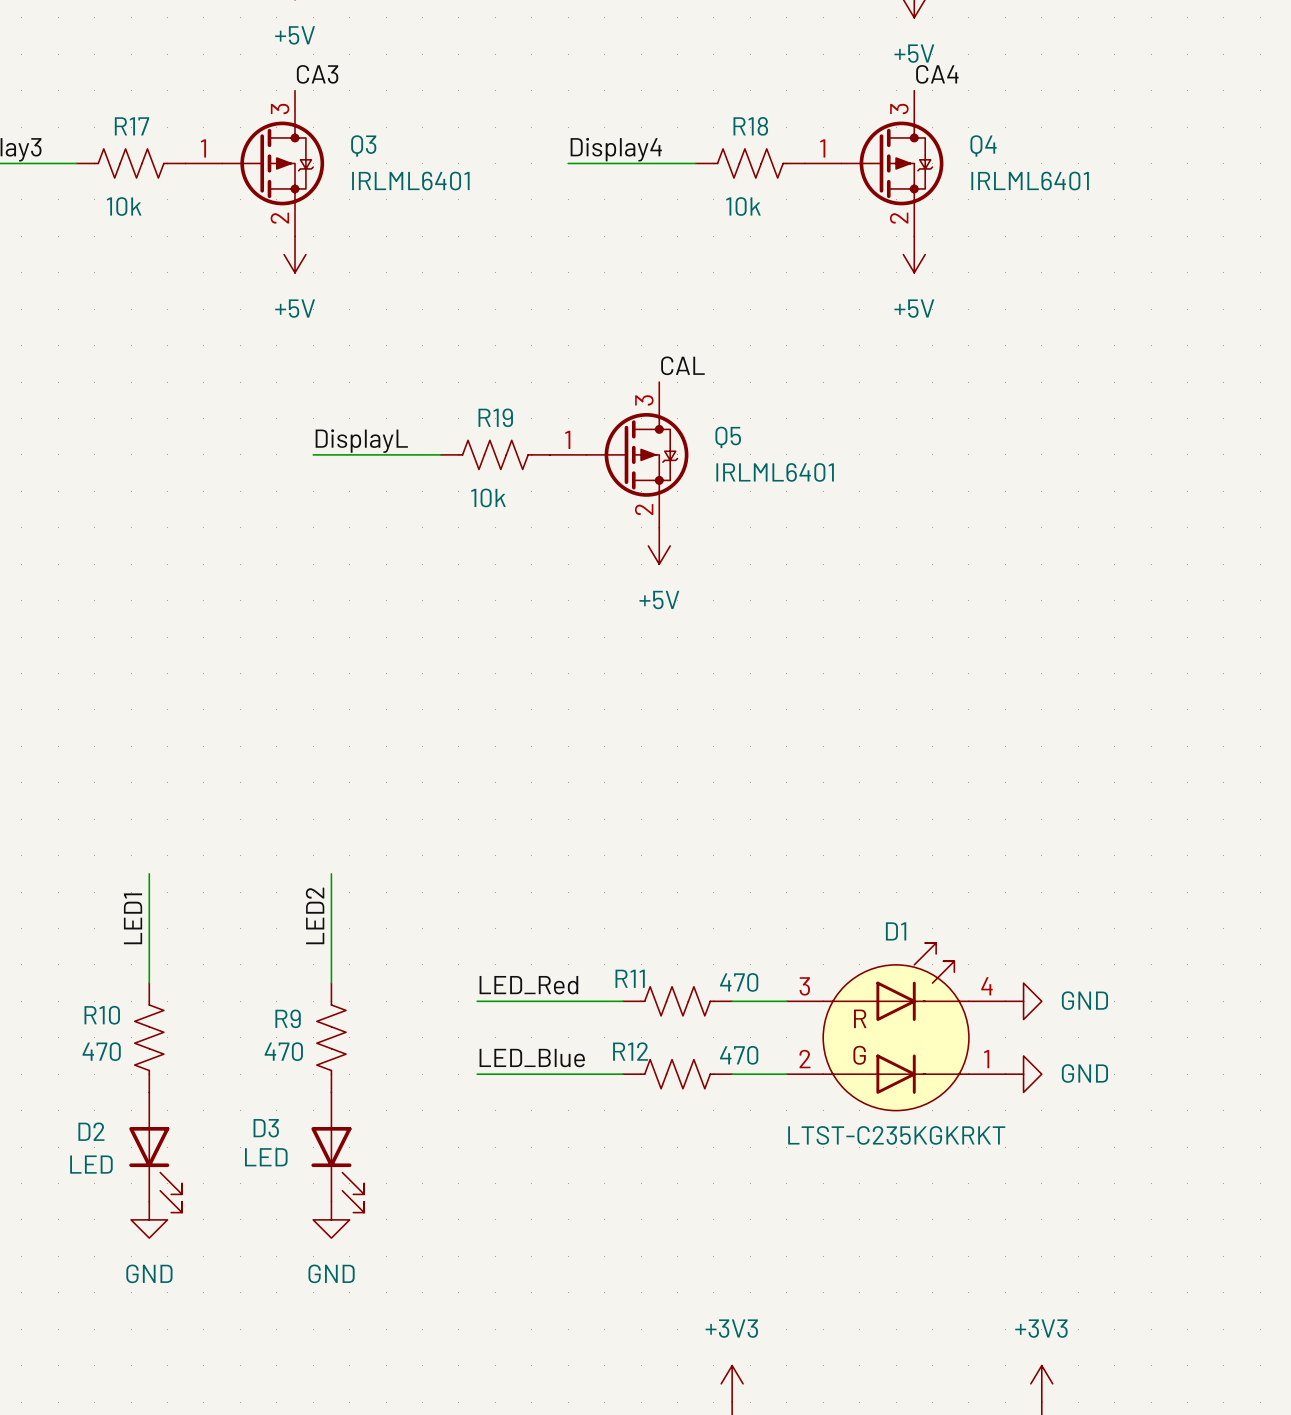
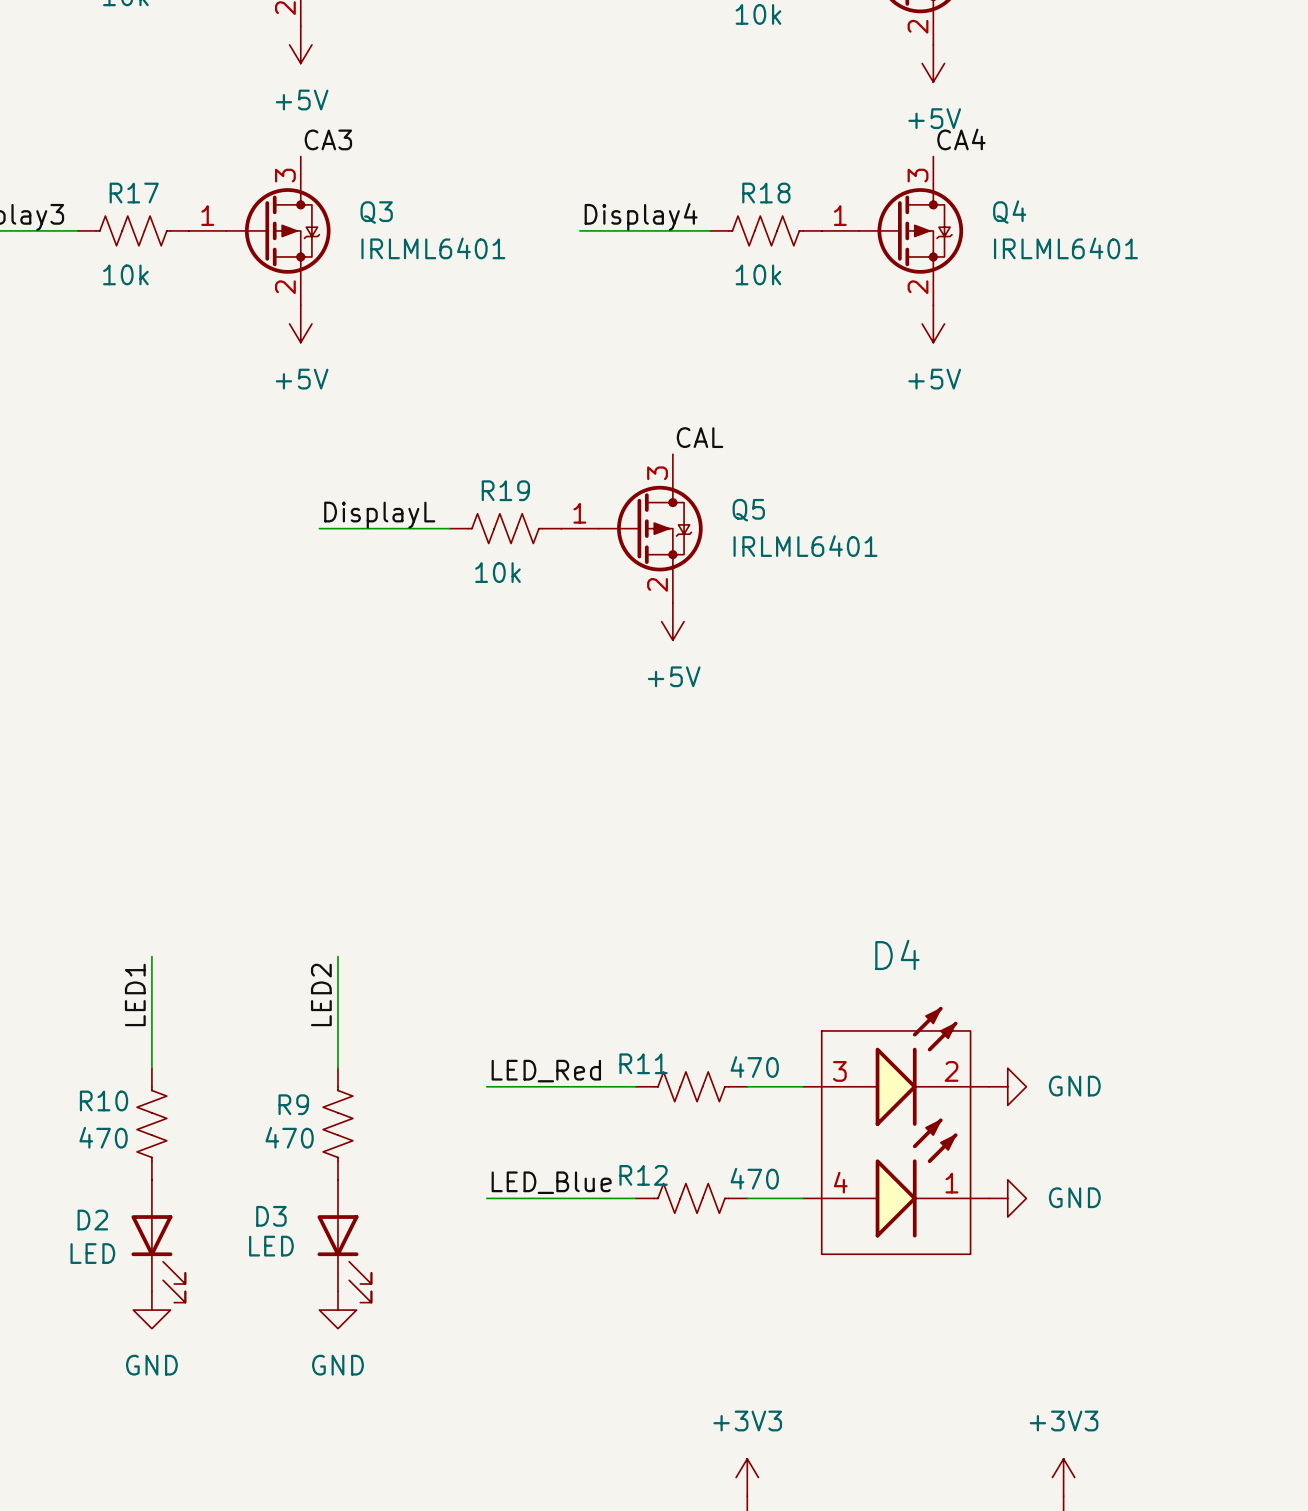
power symbol position: GND (1023, 1001) -> GND (1007, 1086)
D1: LTST-C235KGKRKT (896, 1026) -> none
D4: none -> (896, 1130)
label position: LED_Blue (532, 1058) -> LED_Blue (551, 1182)
wire: (477, 1074) (622, 1074) -> (486, 1198) (635, 1198)
R12 position: (677, 1074) -> (691, 1198)
wire: (732, 1074) (786, 1074) -> (747, 1198) (803, 1198)
power symbol: GND (1023, 1074) -> none
power symbol: none -> GND (1007, 1198)

